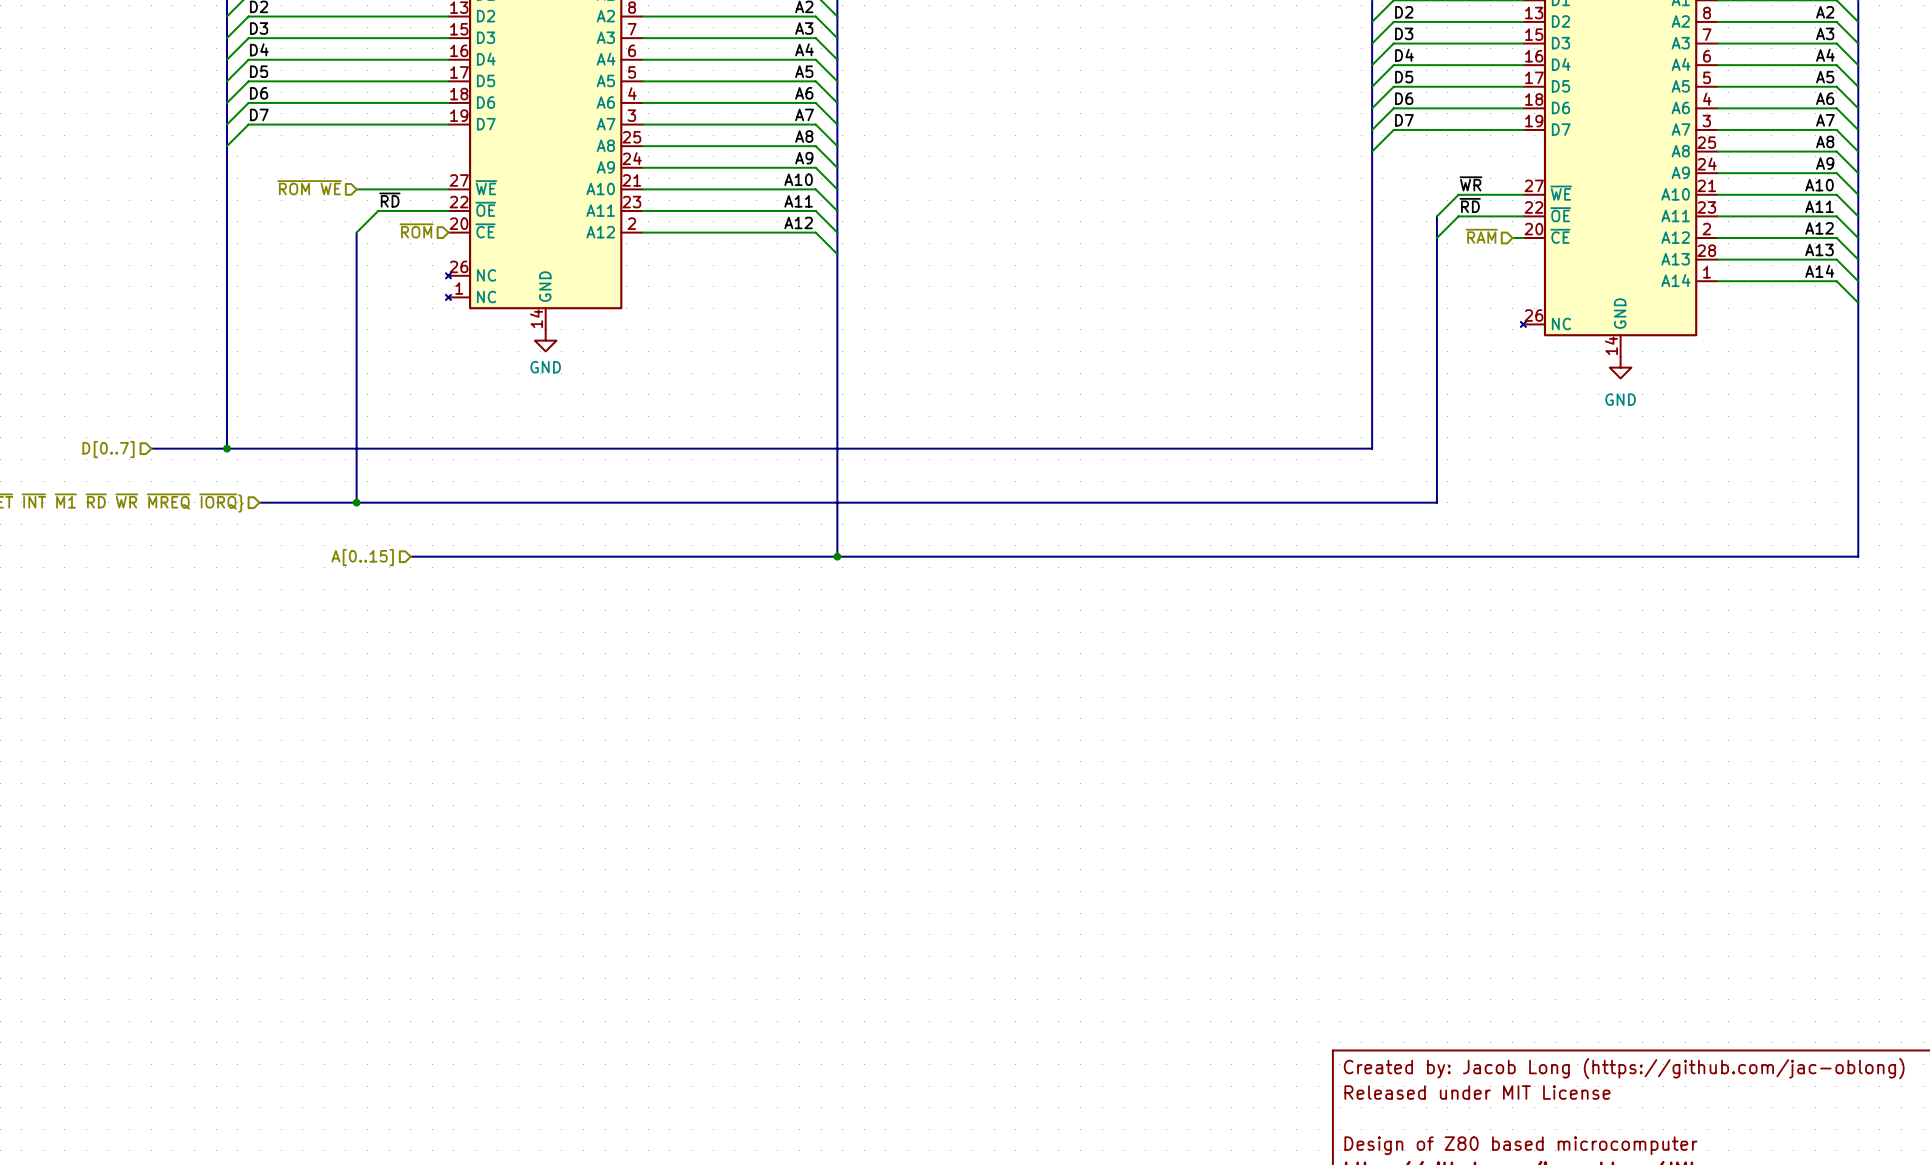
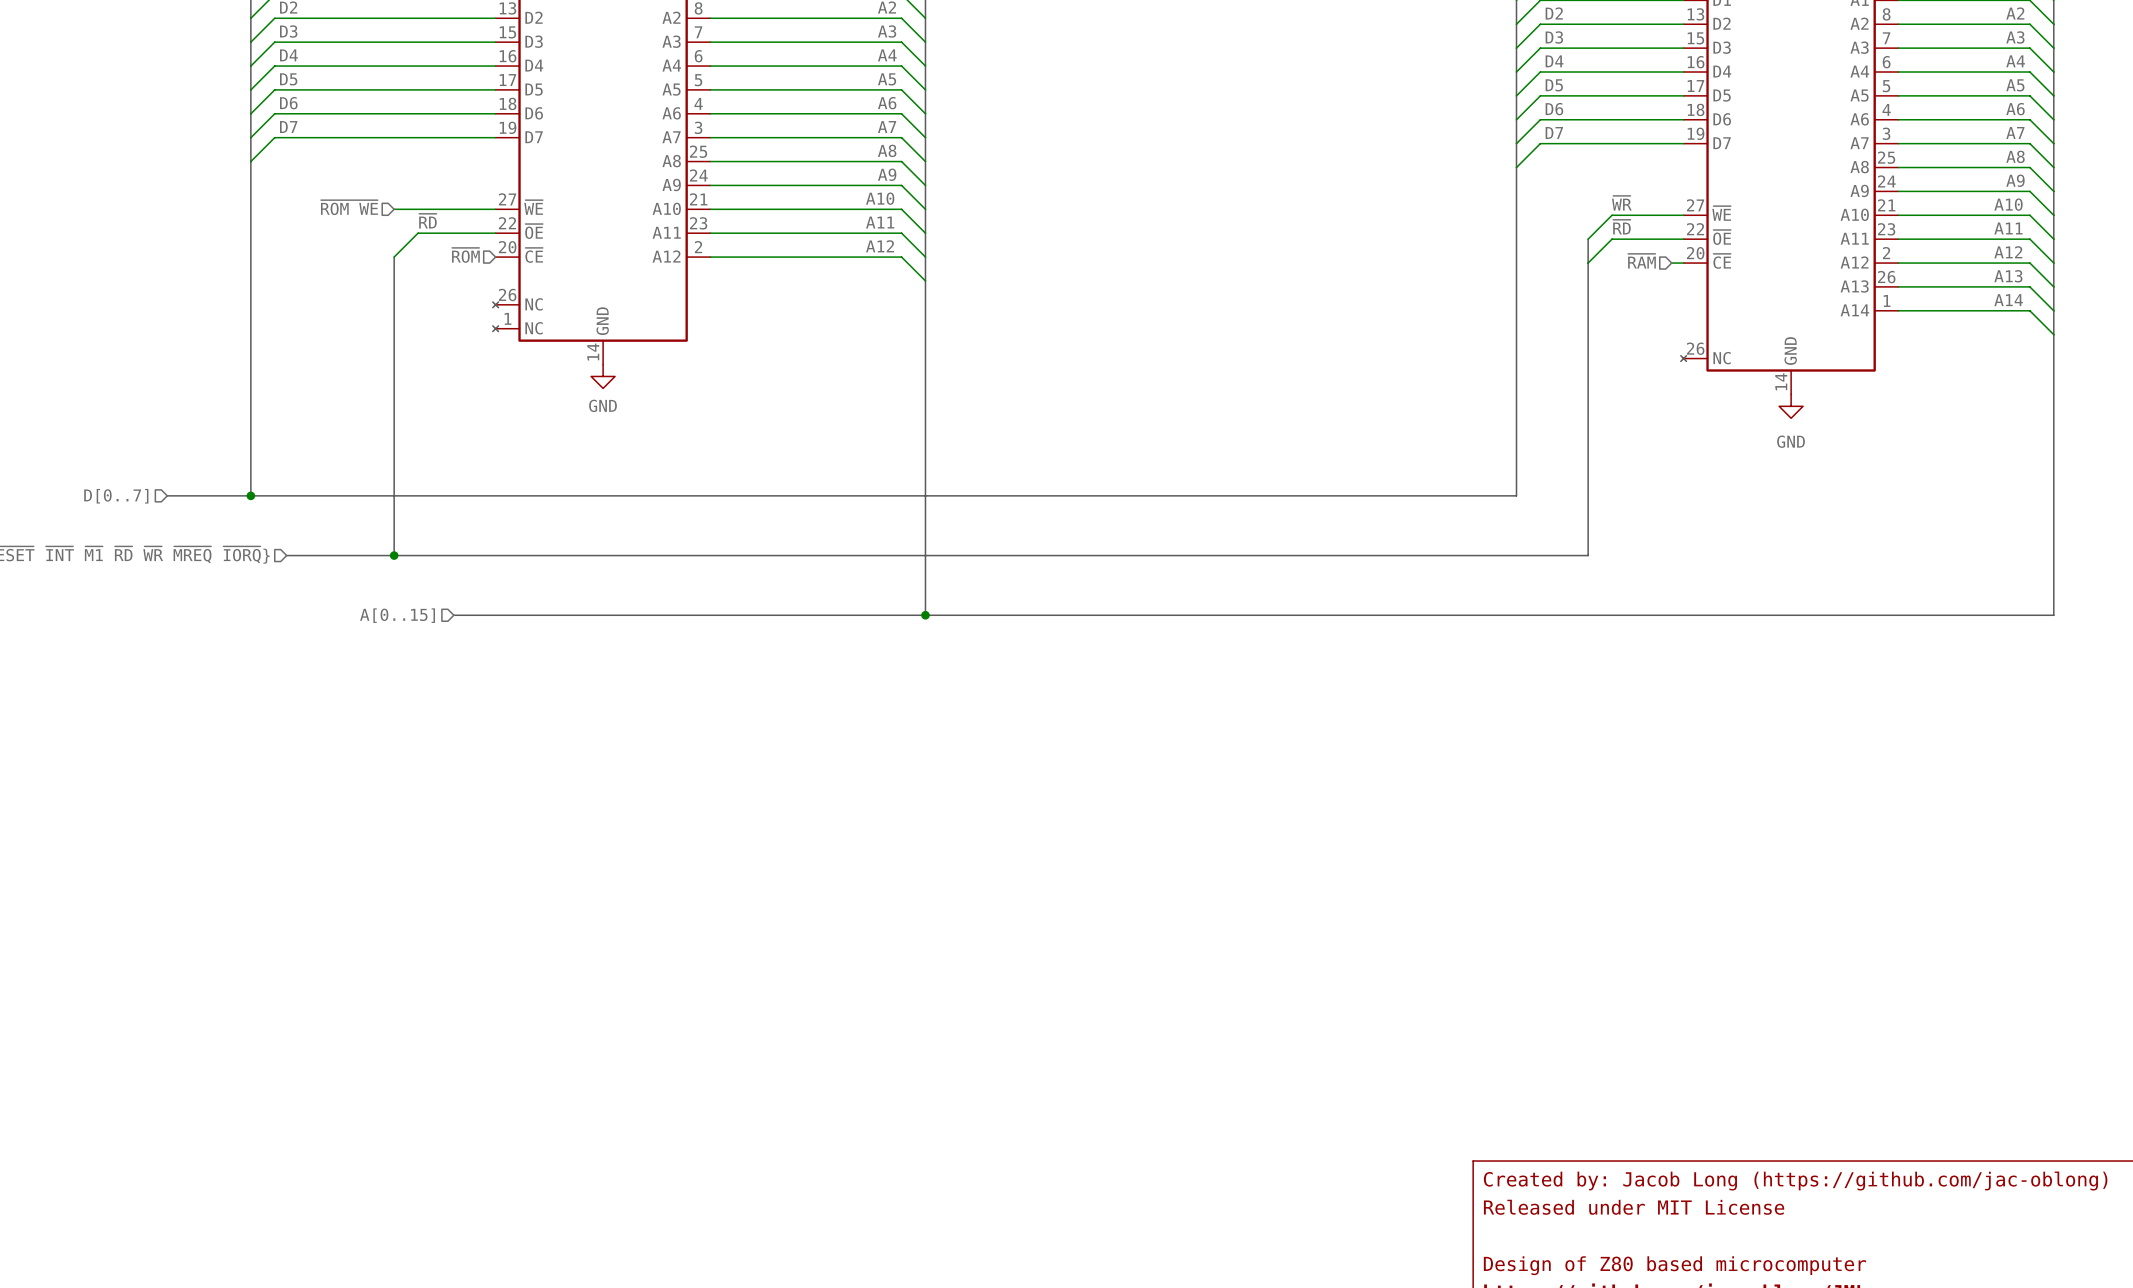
part pin number: 28 (1706, 250) -> 26 (1886, 277)

